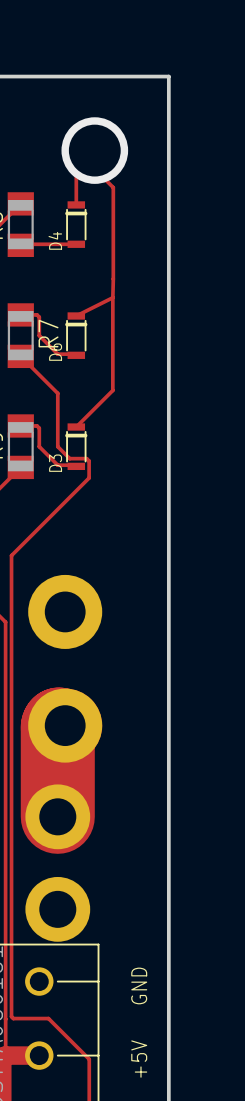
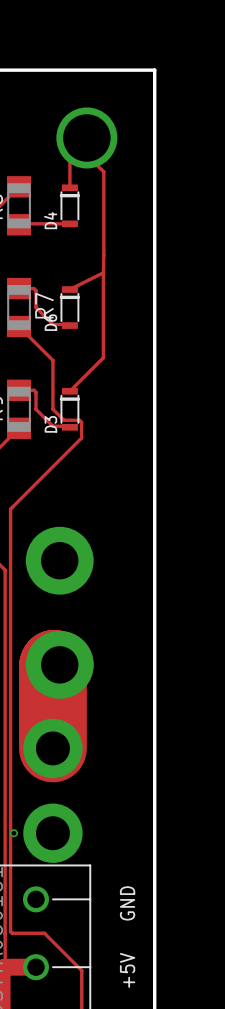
via: none -> (13, 833)

